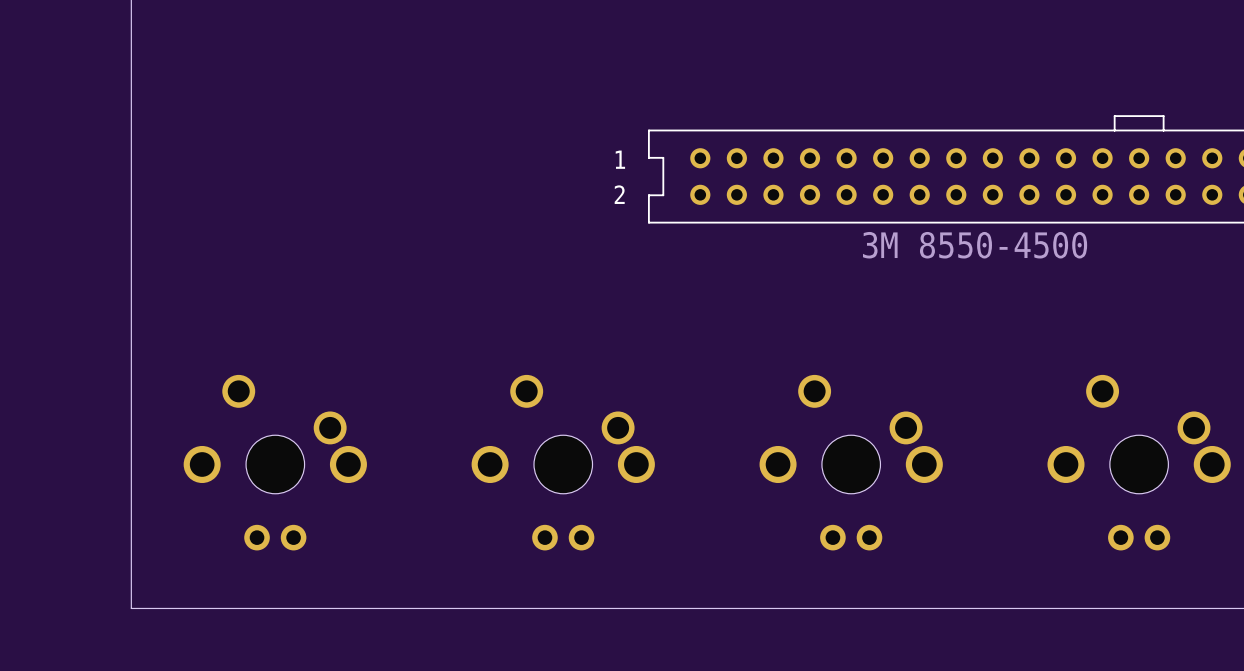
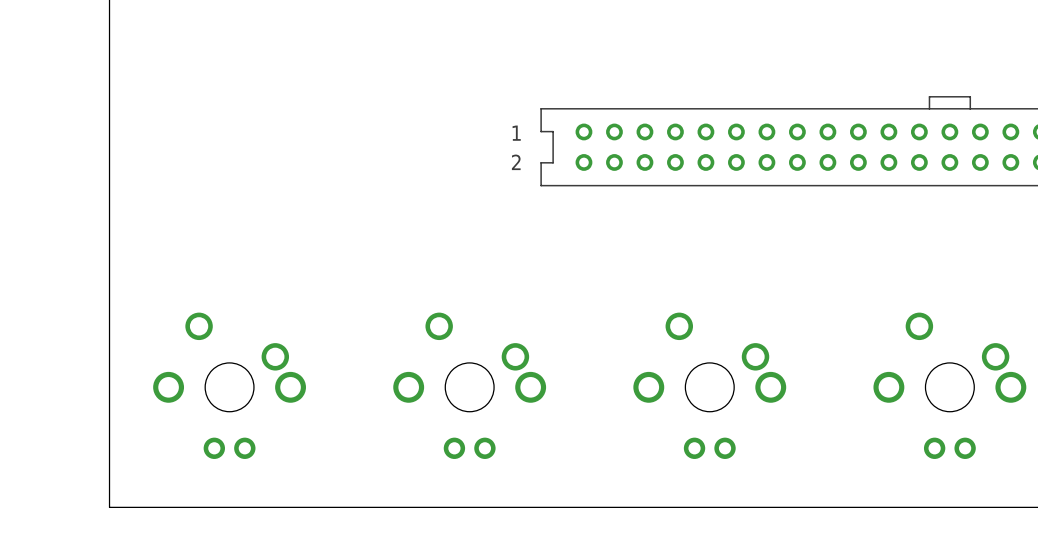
part value: 3M 8550-4500 (975, 245) -> none

